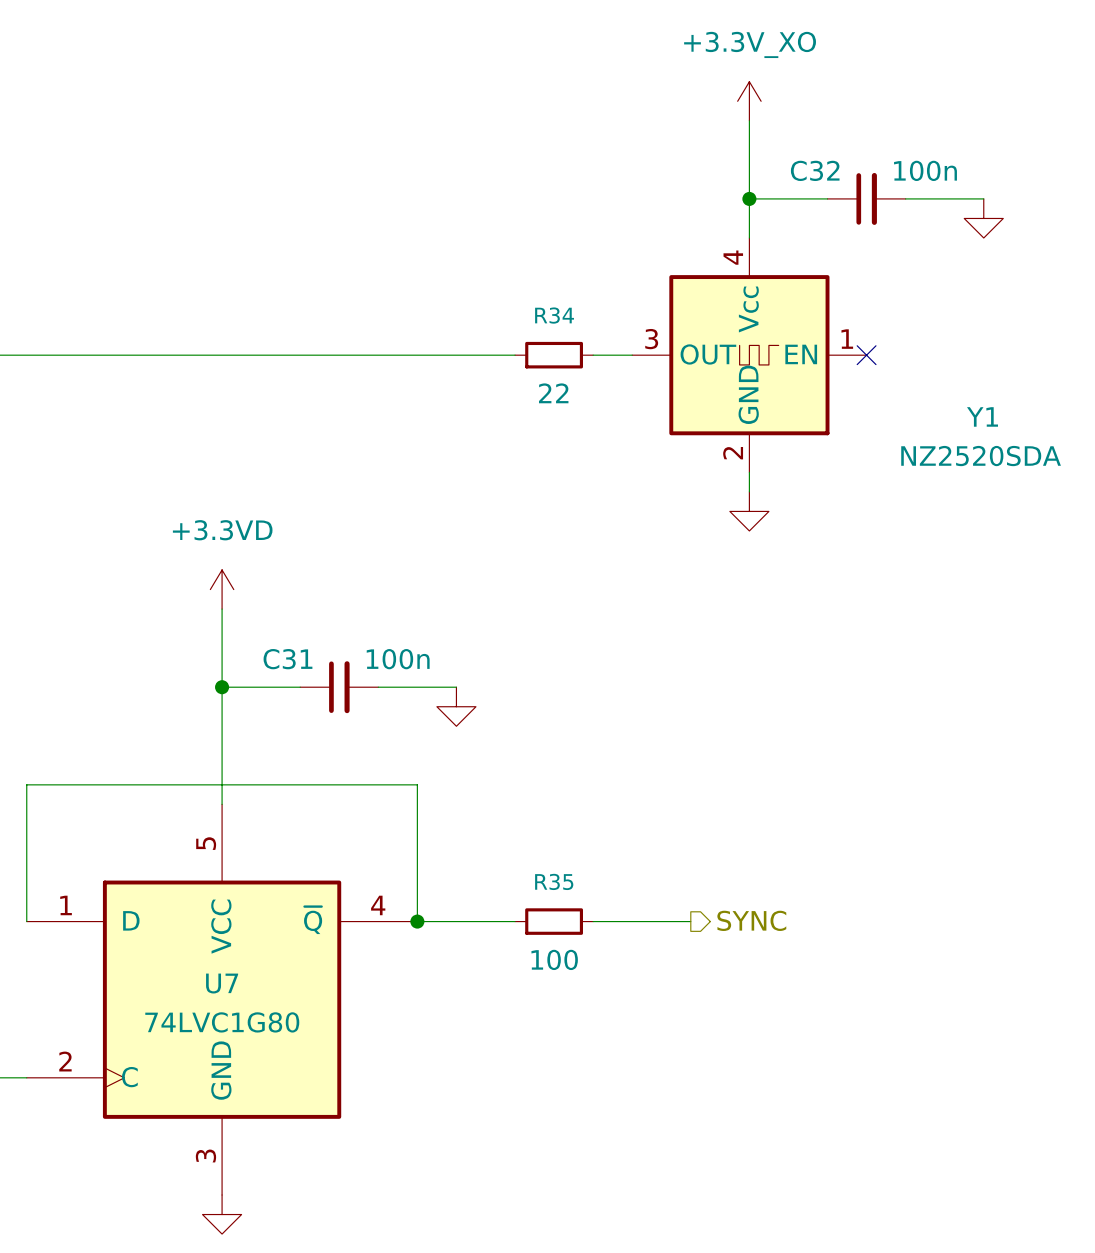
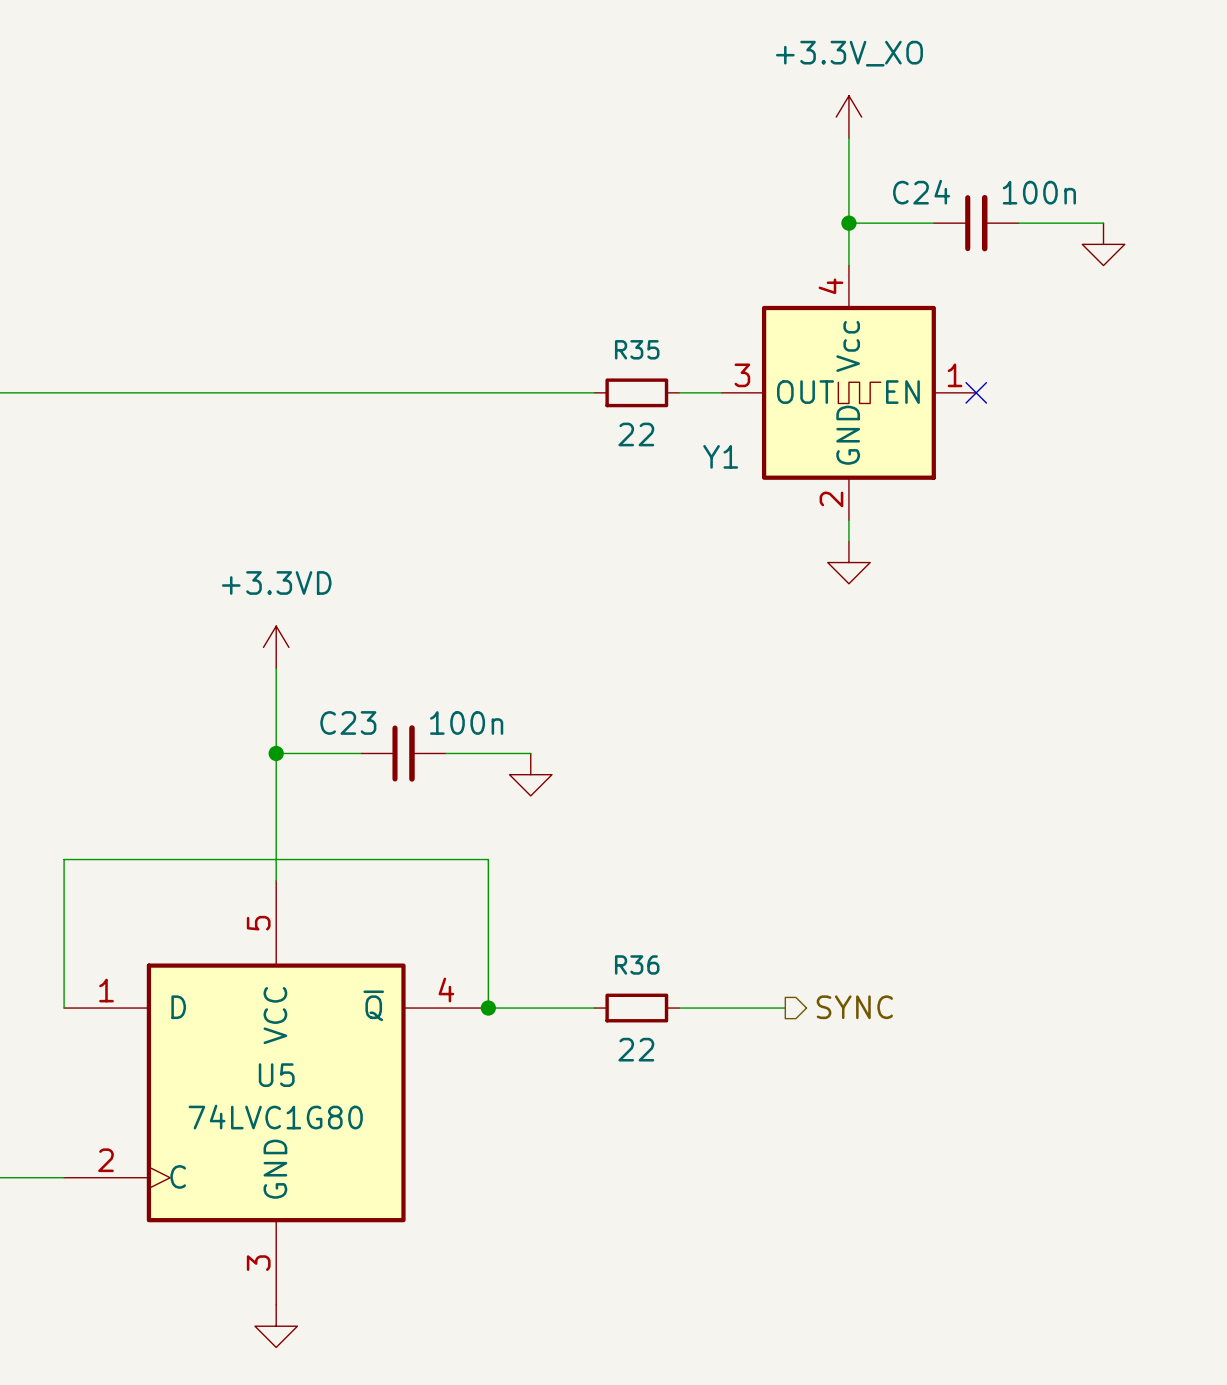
C32 name: C32 (815, 170) -> C24 (921, 192)
R34 name: R34 (554, 315) -> R35 (637, 349)
Y1 name position: Y1 (982, 416) -> Y1 (720, 456)
Y1 value: NZ2520SDA (981, 456) -> none
C31 name: C31 (287, 659) -> C23 (348, 722)
R35 name: R35 (554, 881) -> R36 (637, 964)
R35 value: 100 (554, 959) -> 22 (636, 1049)
U7 name: U7 (222, 983) -> U5 (276, 1075)

